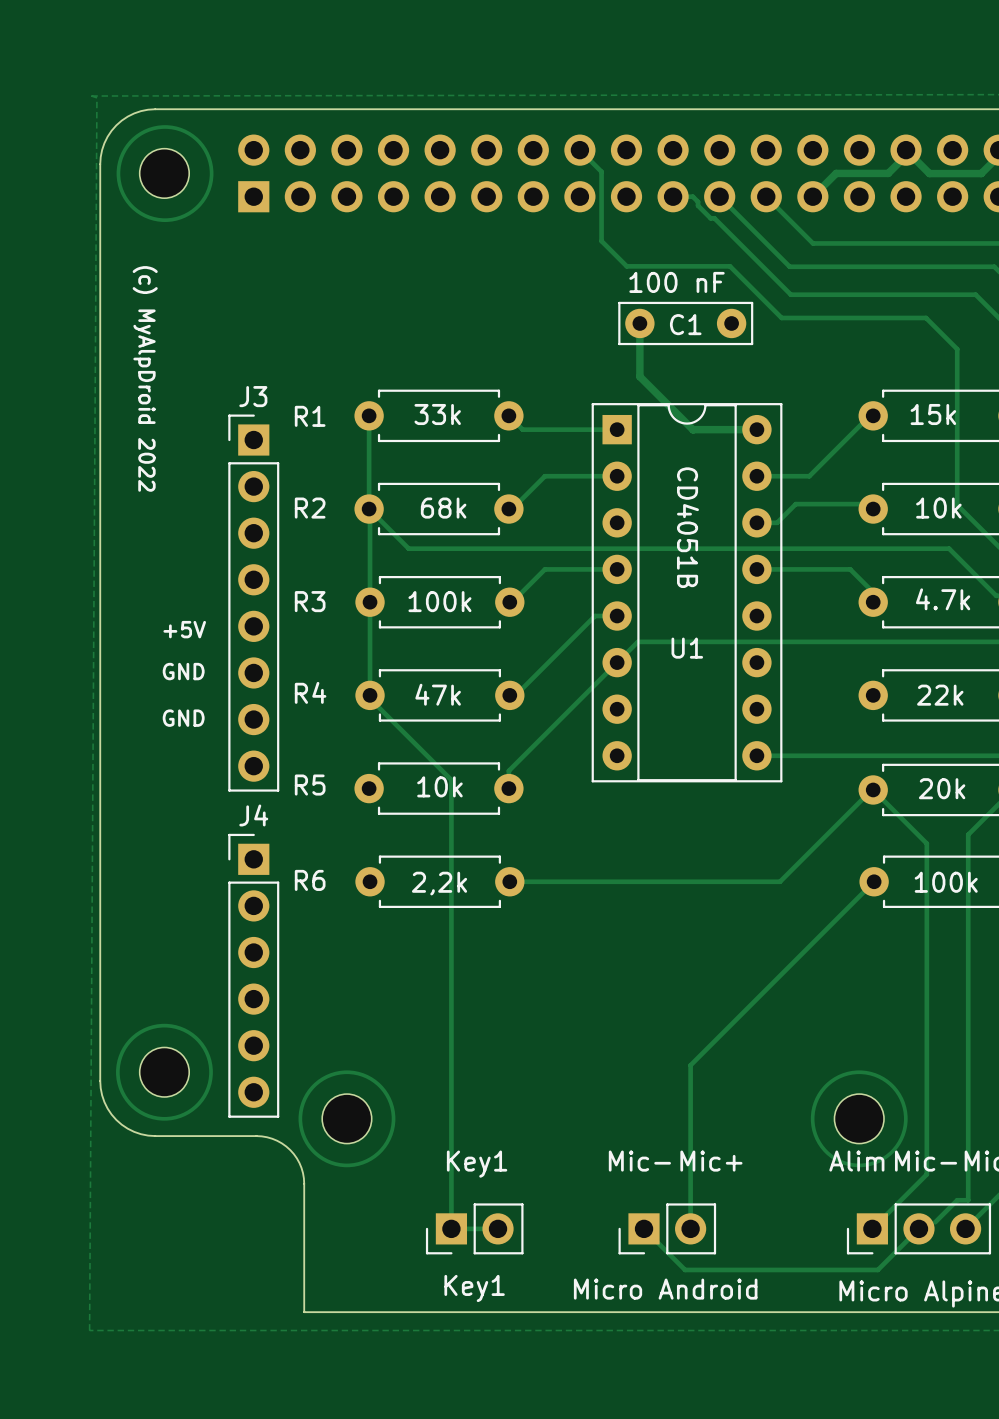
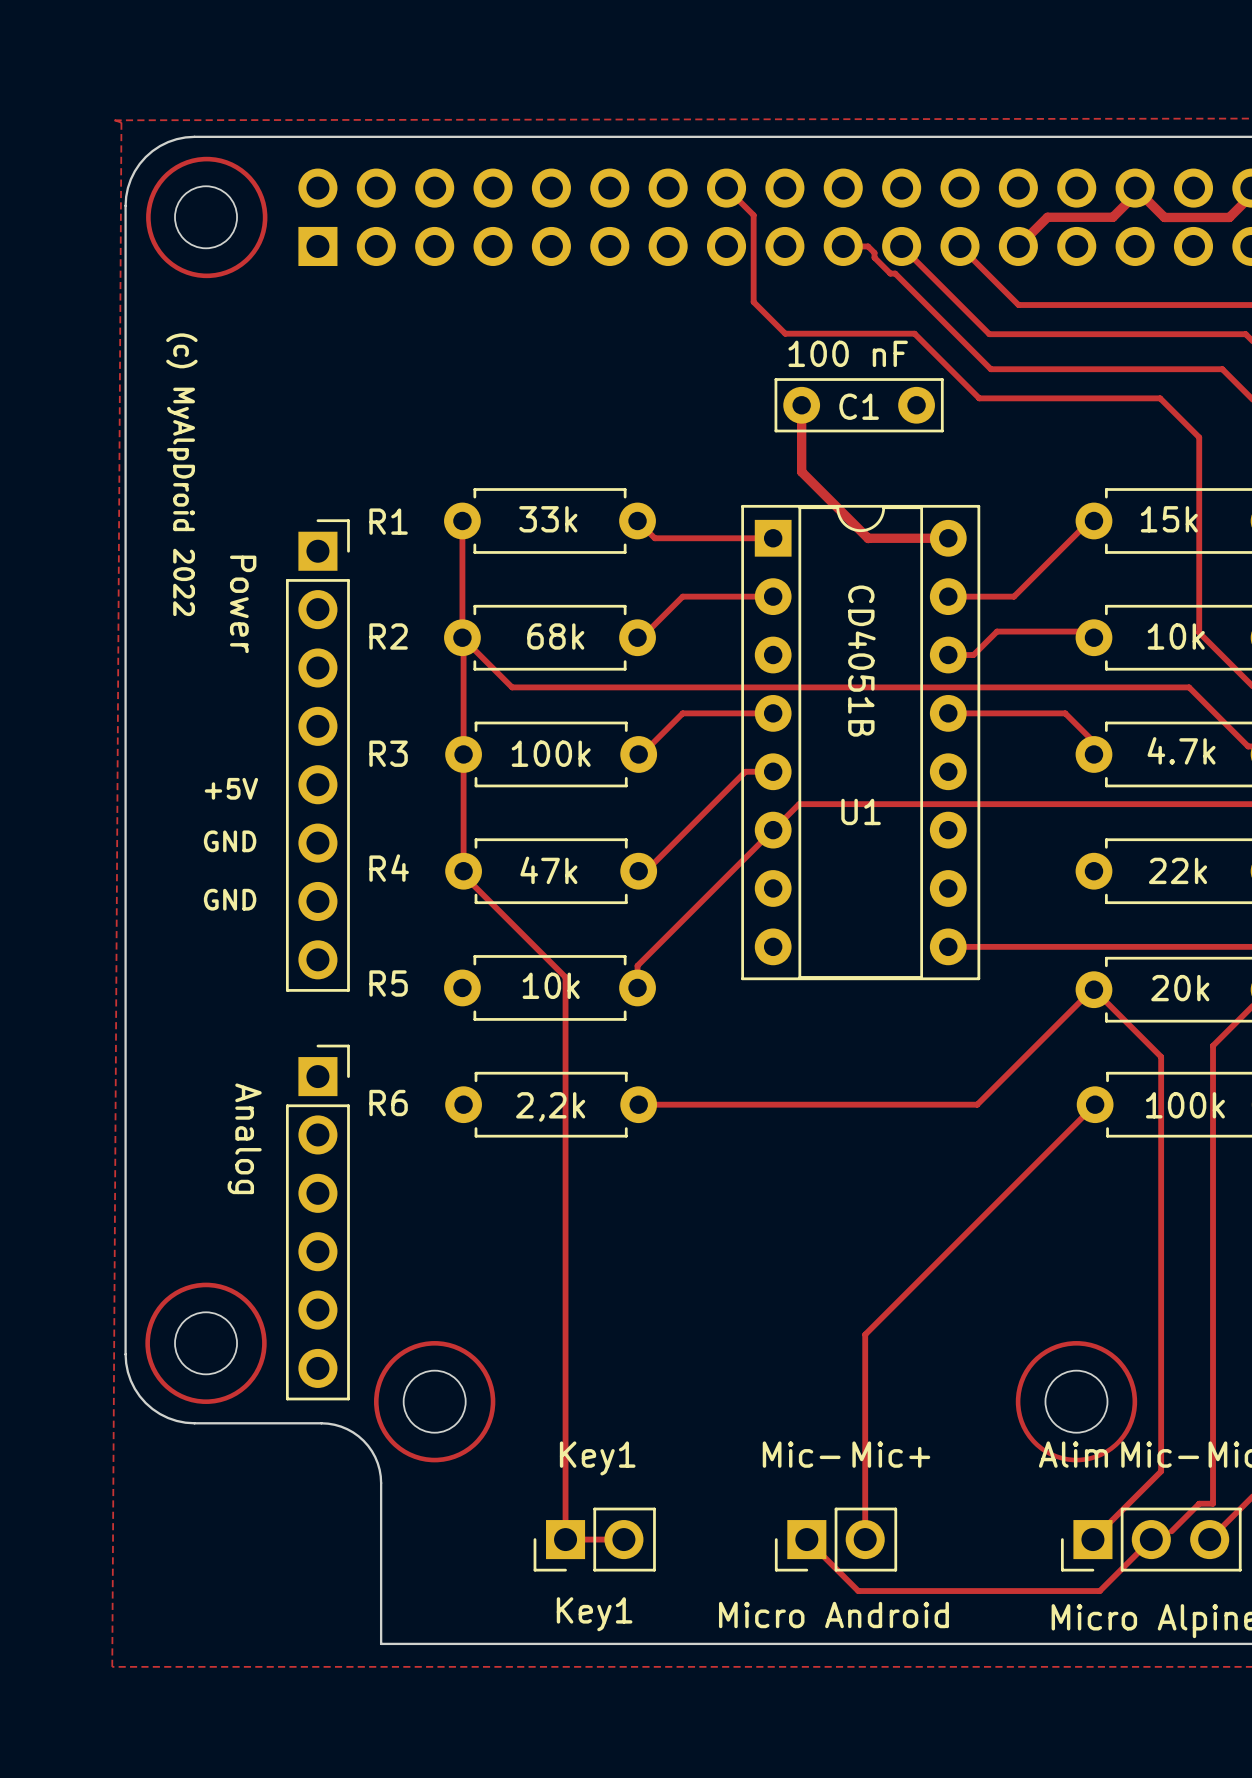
J3: (253, 603) -> none
part: none -> Power (317, 755)
J4: (253, 975) -> none
part: none -> Analog (317, 1222)

